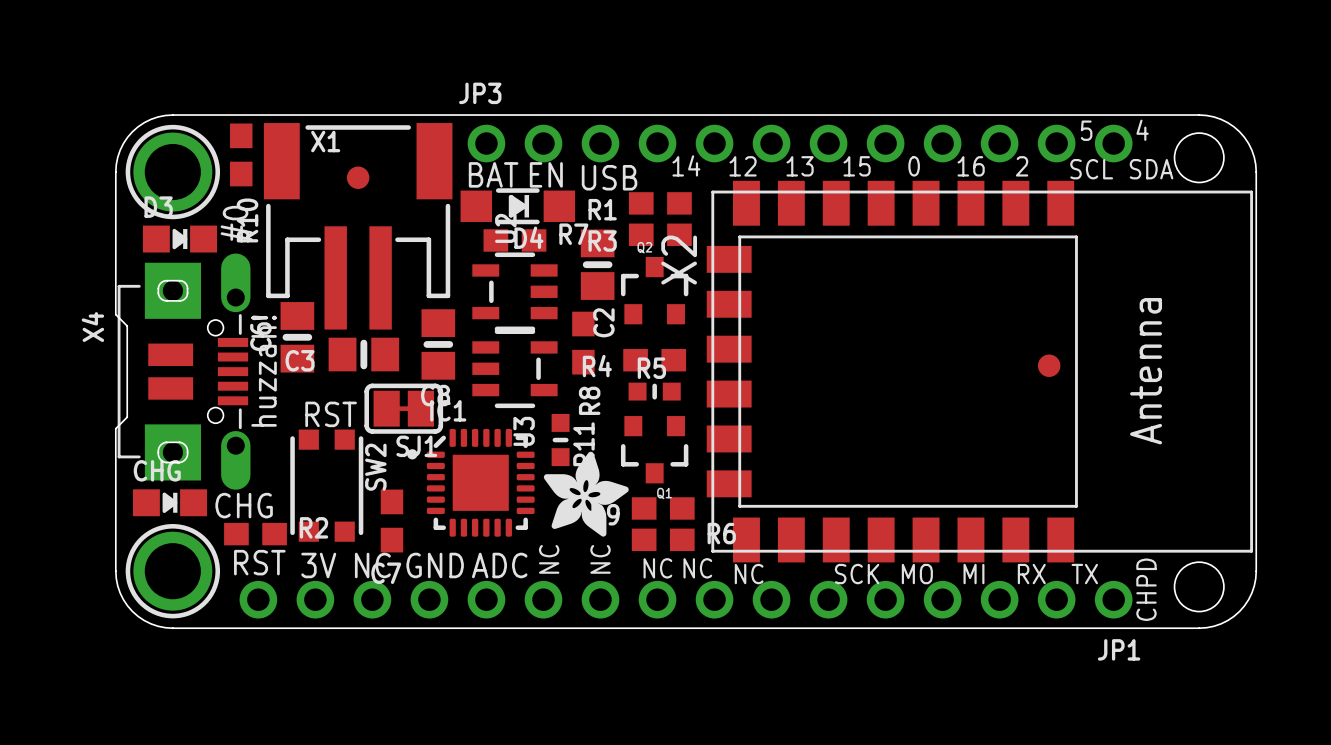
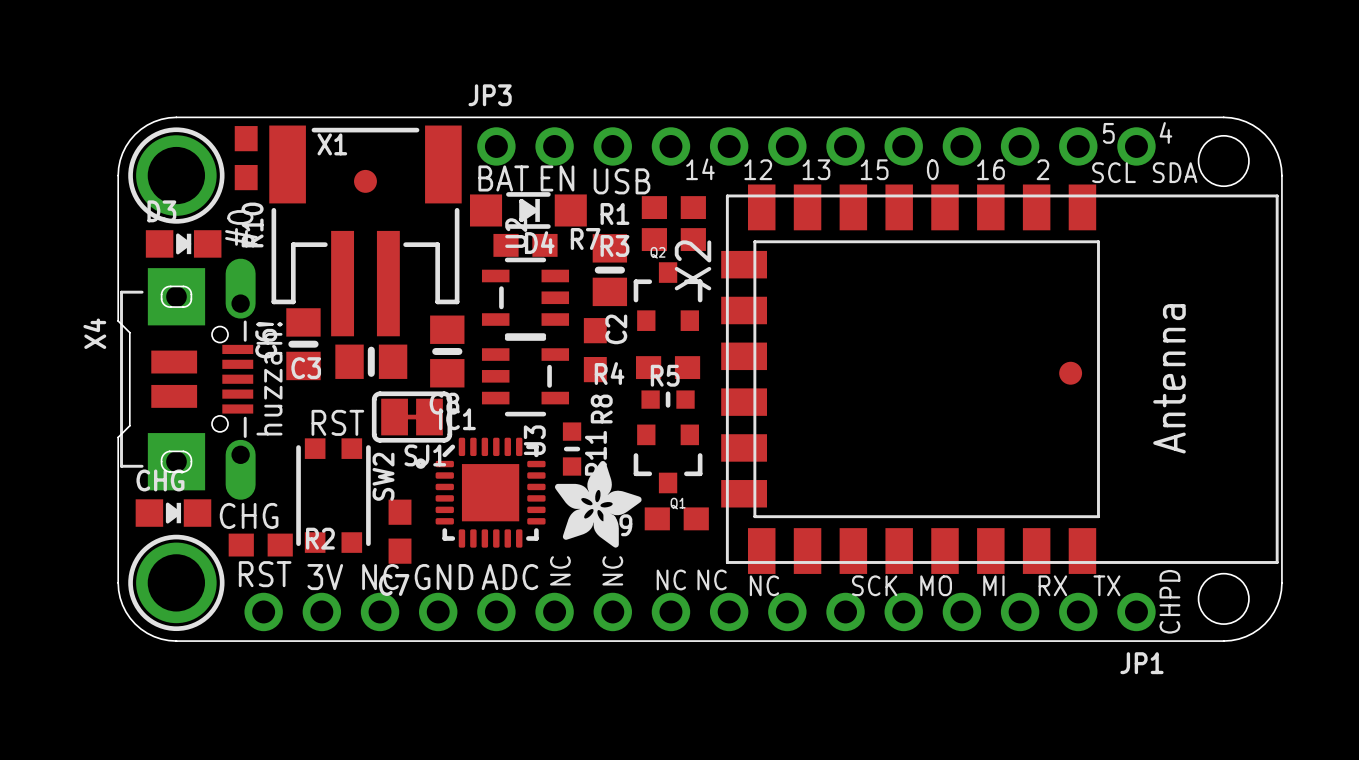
R6: (663, 539) -> none

